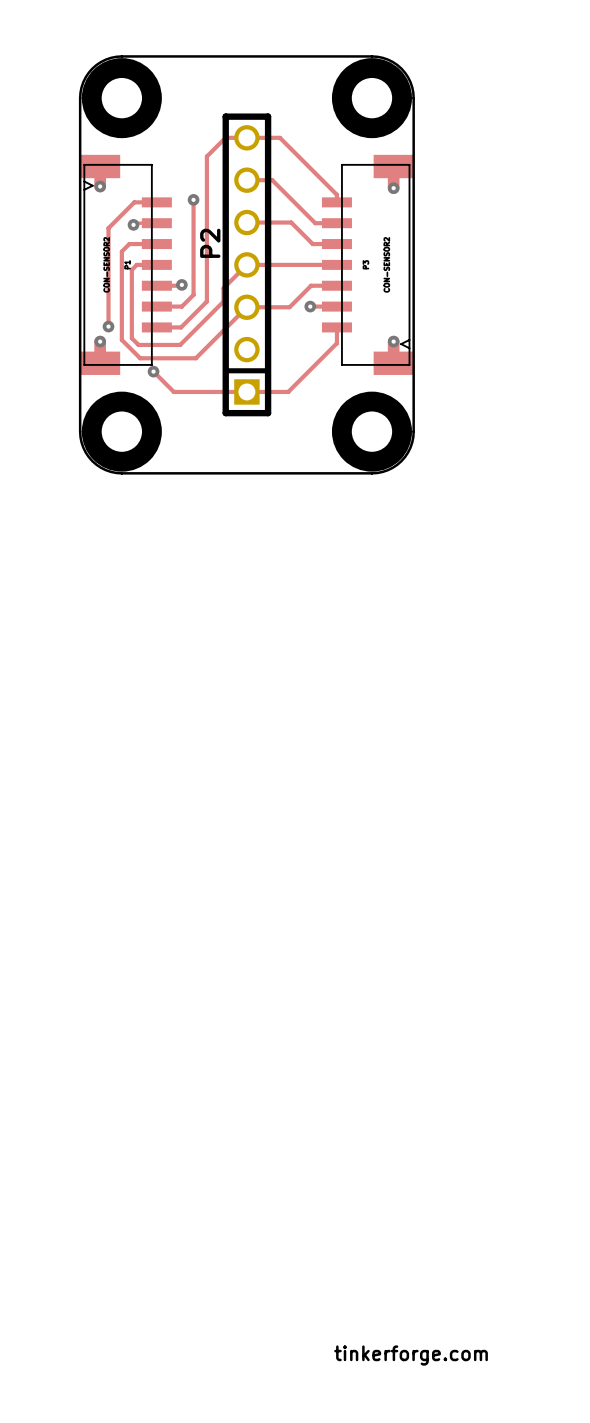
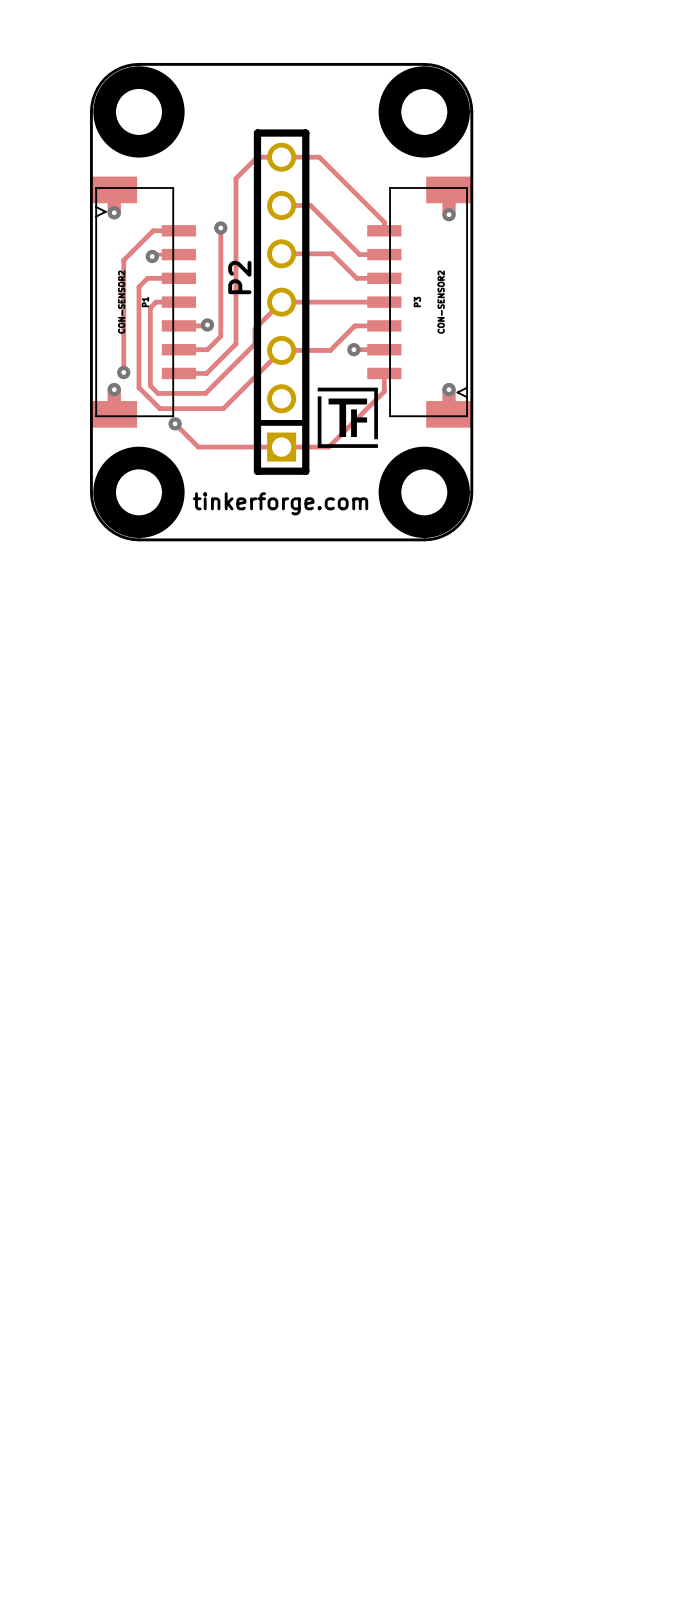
drawing: none -> [317, 387, 378, 448]
text: none -> tinkerforge.com (280, 503)
text: tinkerforge.com (411, 1355) -> none

